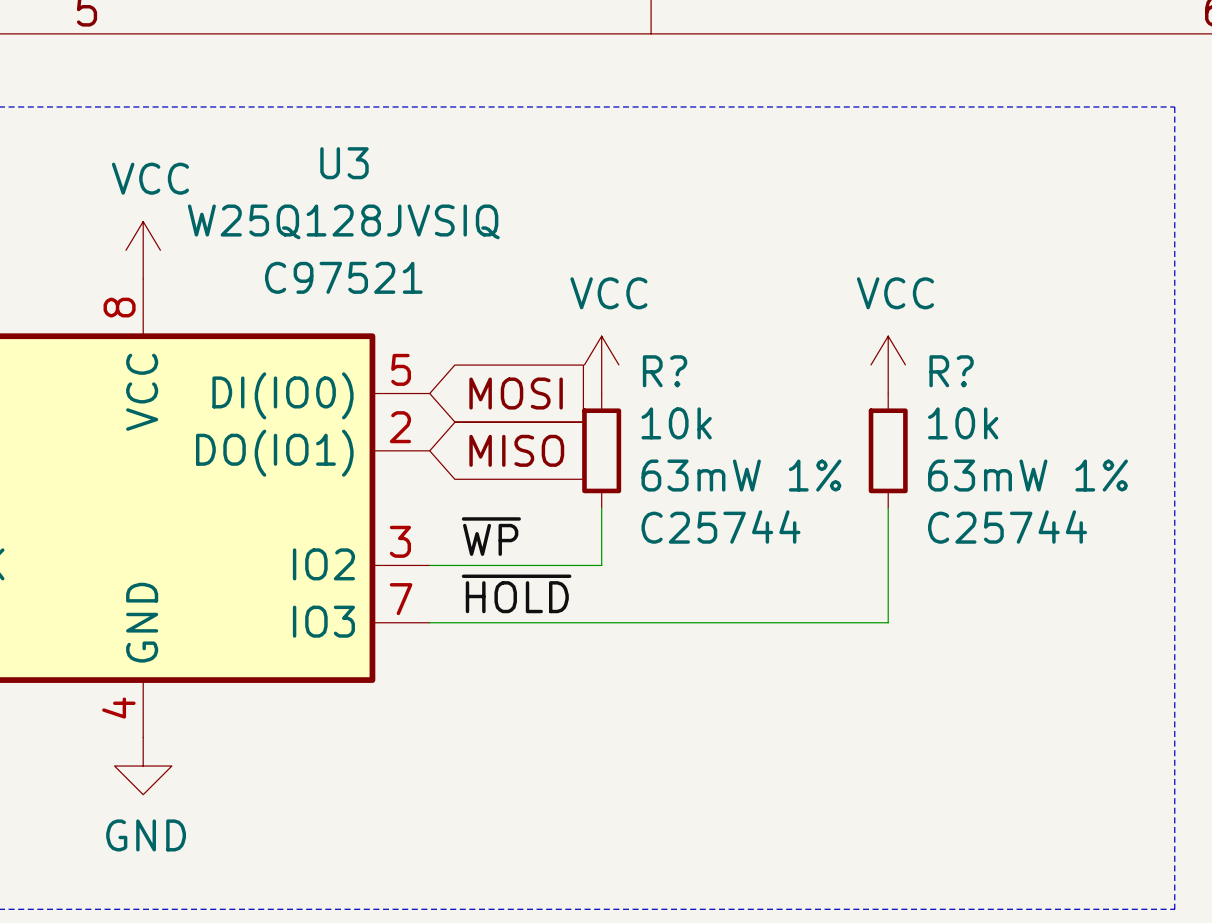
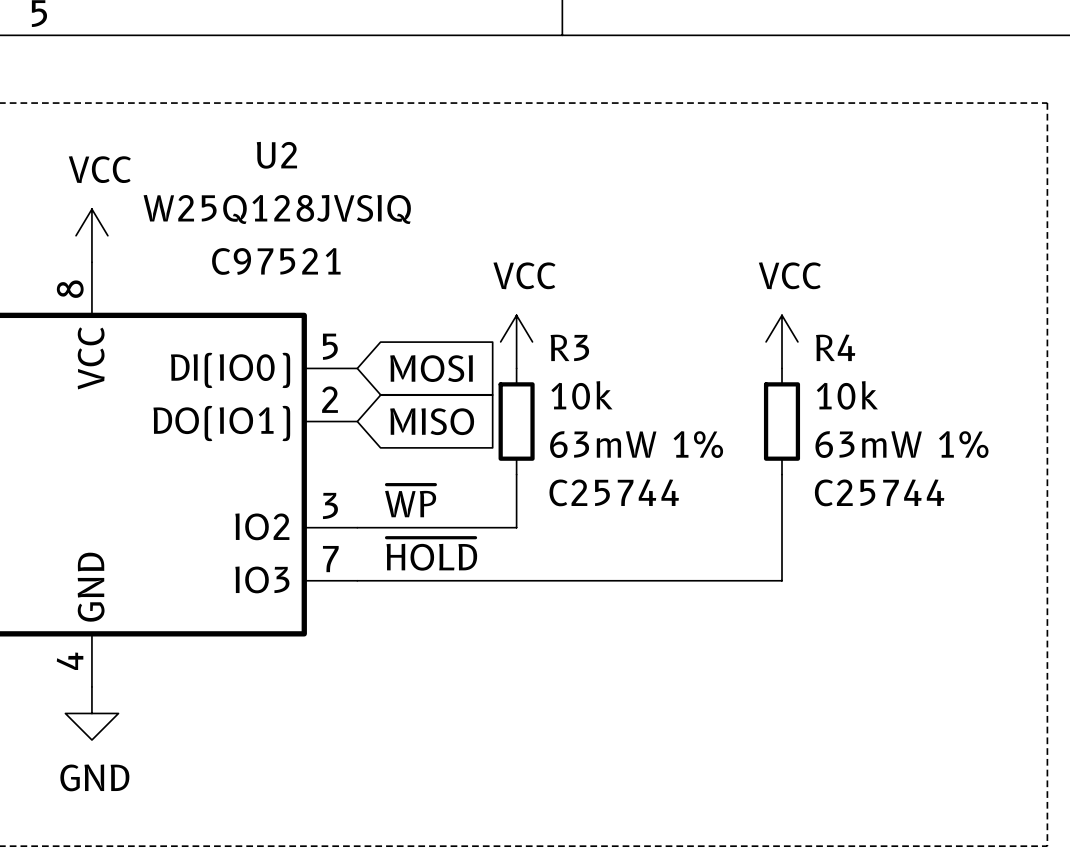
U3 name: U3 (344, 163) -> U2 (276, 155)
R? name: R? (665, 371) -> R3 (569, 347)
R? name: R? (951, 371) -> R4 (835, 347)

